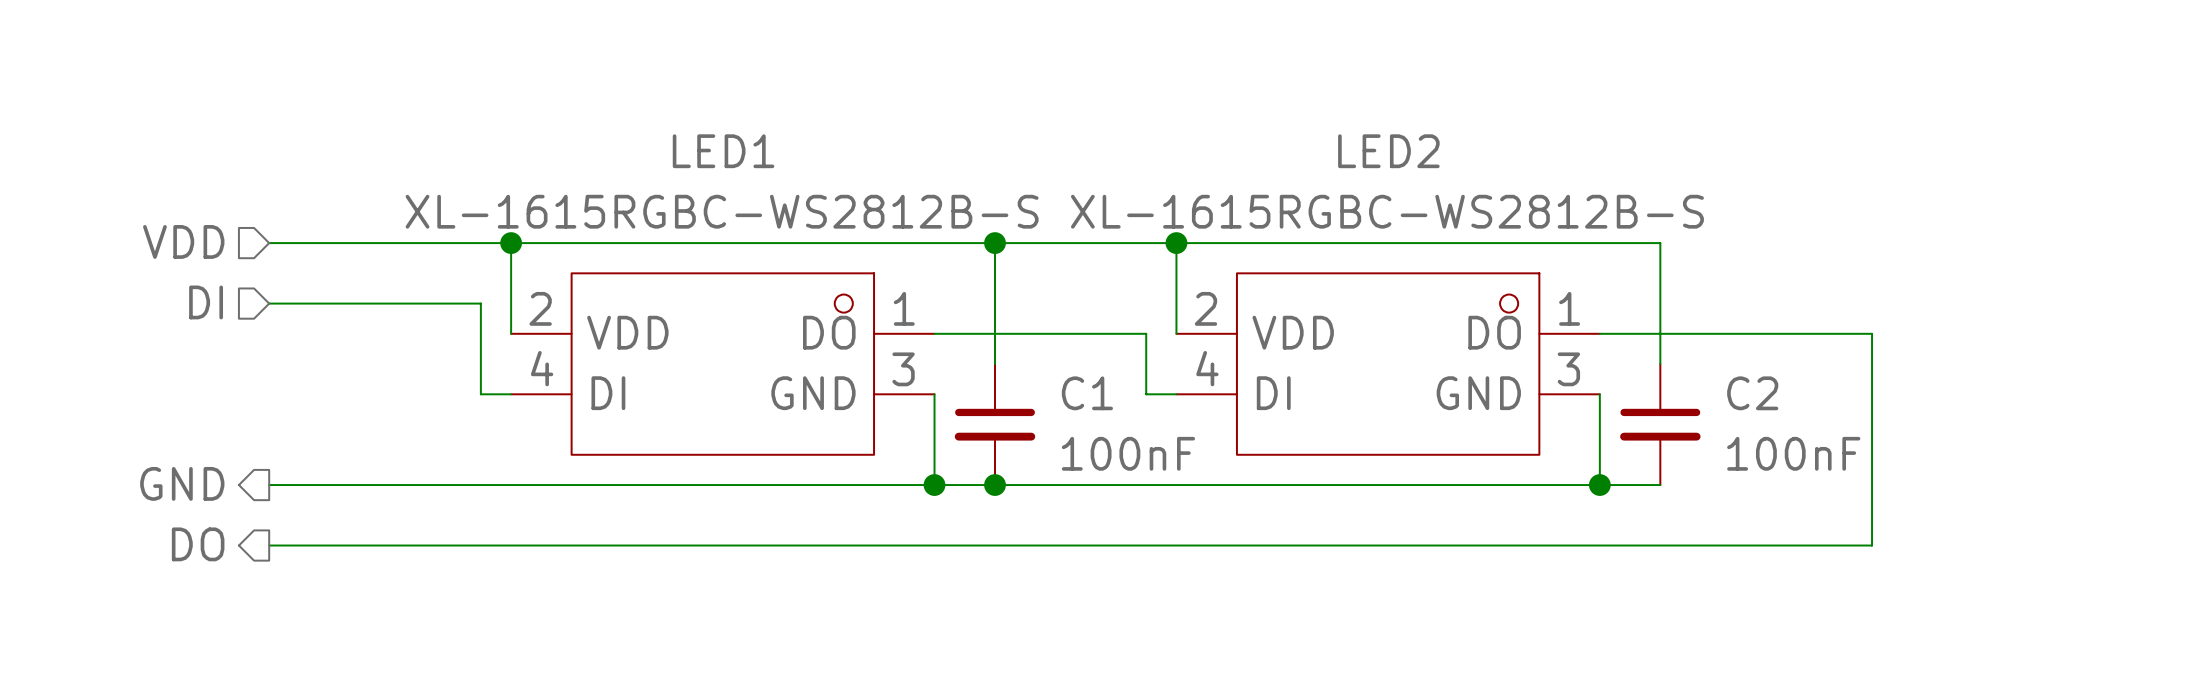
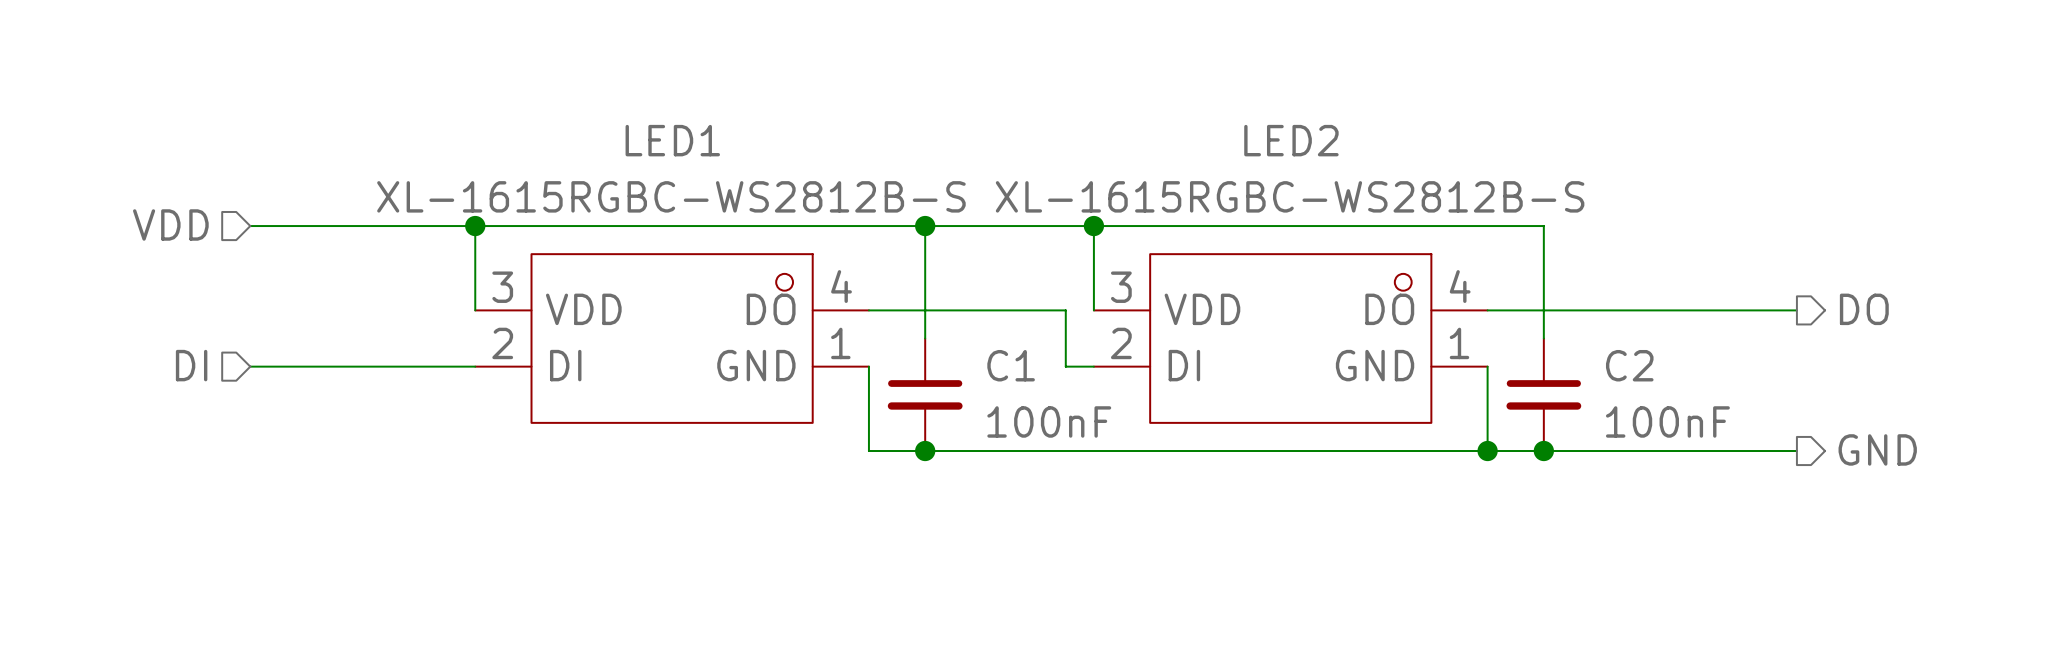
hierarchical label position: DI (206, 302) -> DI (191, 365)
wire: (269, 303) (480, 303) (480, 394) -> (250, 366) (447, 366)
LED1 pin number: 2 (540, 308) -> 3 (502, 287)
LED1 pin number: 1 (904, 308) -> 4 (841, 286)
LED2 pin number: 2 (1205, 308) -> 3 (1121, 287)
LED2 pin number: 1 (1569, 308) -> 4 (1460, 286)
hierarchical label: none -> DO (1864, 309)
wire: (1872, 333) (1872, 545) (269, 545) -> (1740, 310) (1796, 310)
LED1 pin number: 4 (542, 368) -> 2 (502, 343)
LED2 pin number: 4 (1207, 368) -> 2 (1121, 343)
LED1 pin number: 3 (903, 369) -> 1 (840, 343)
LED2 pin number: 3 (1568, 369) -> 1 (1459, 343)
hierarchical label: GND (182, 483) -> none
hierarchical label: none -> GND (1877, 449)
wire: (269, 485) (934, 485) -> none
junction: (934, 485) -> none
wire: none -> (1543, 451) (1796, 451)
junction: none -> (1543, 451)
hierarchical label: DO (198, 544) -> none

